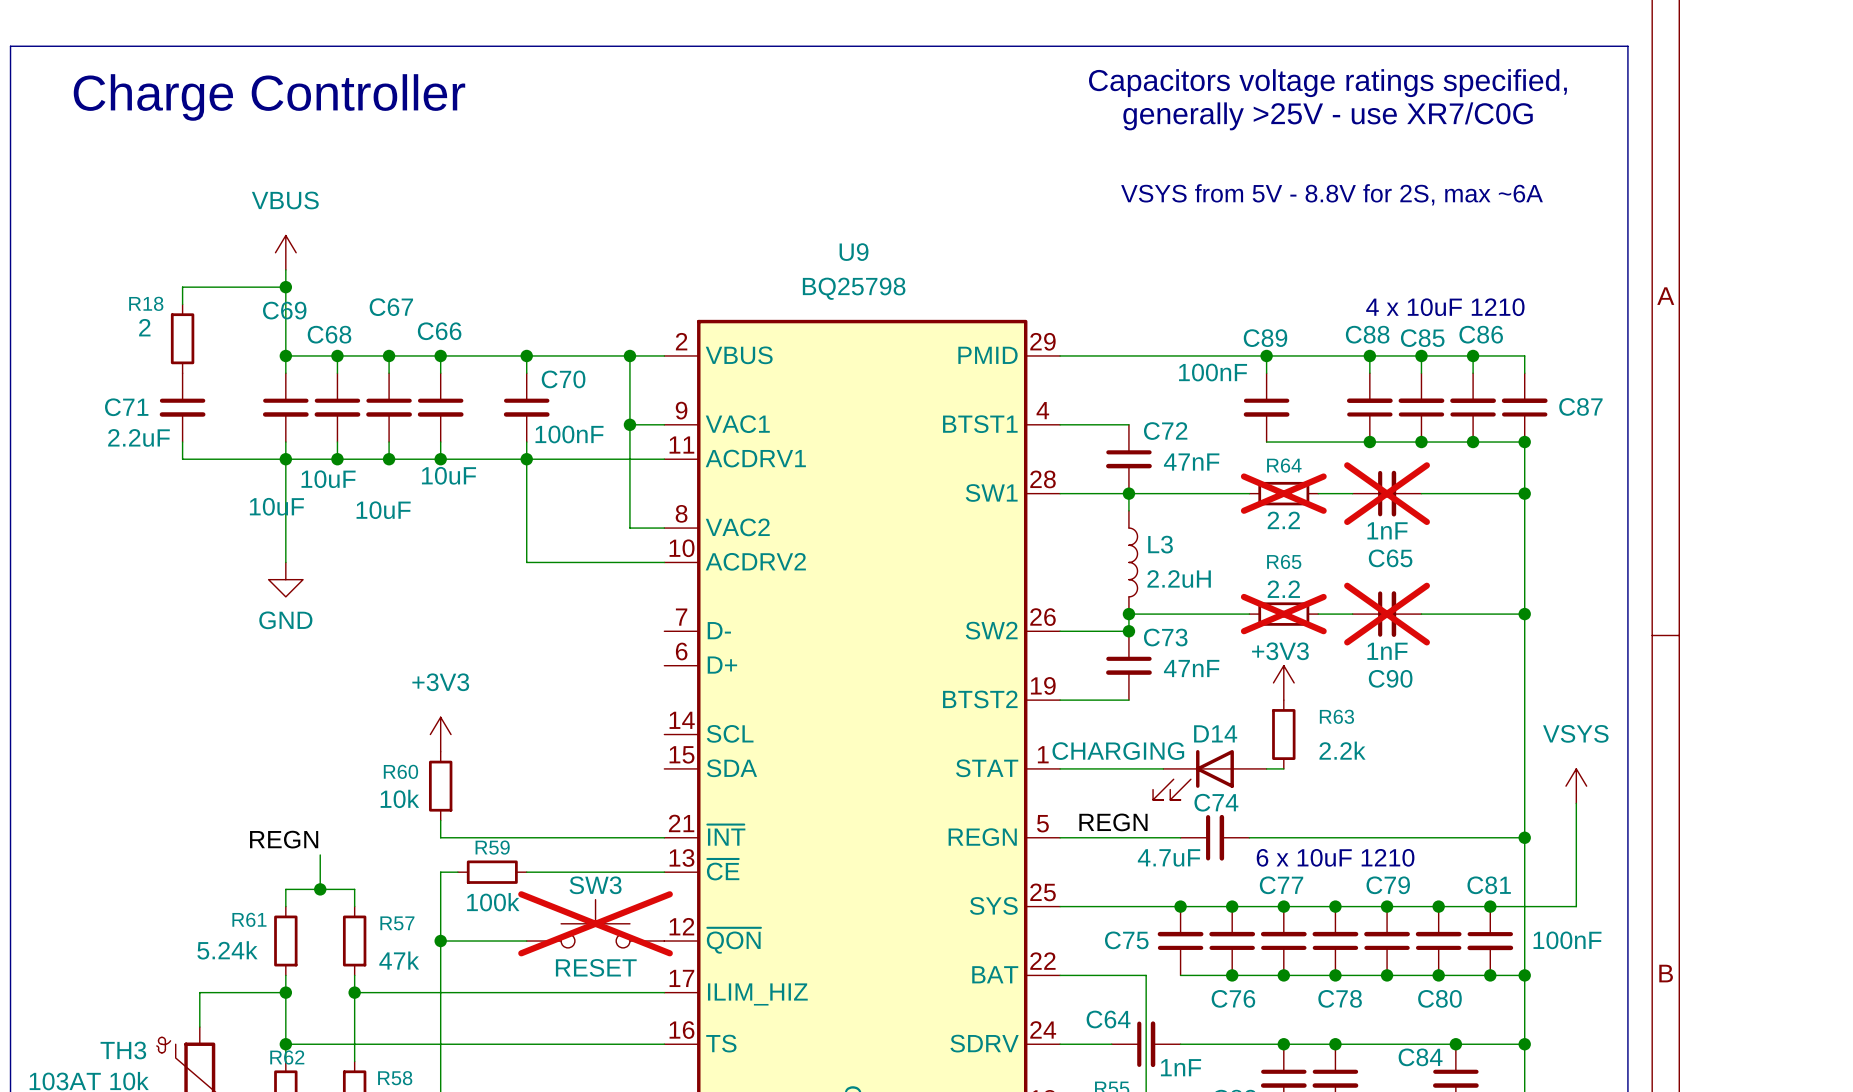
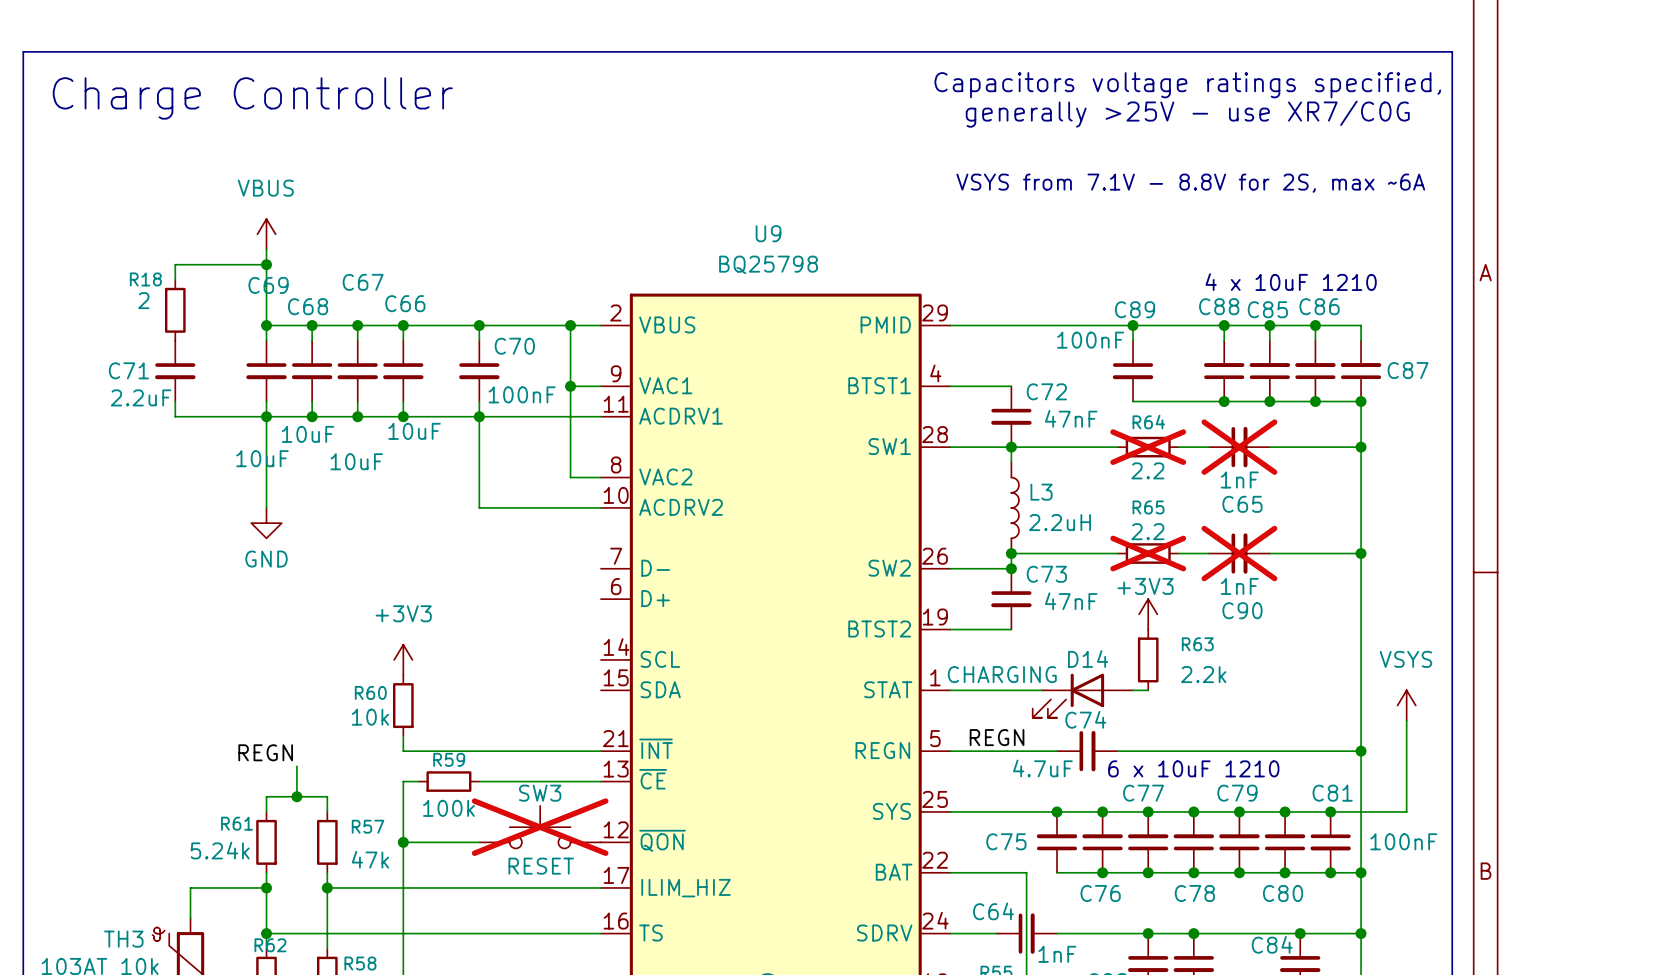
text: VSYS from 5V - 8.8V for 2S, max ~6A (1332, 194) -> VSYS from 7.1V - 8.8V for 2S, max ~6A (1190, 183)

